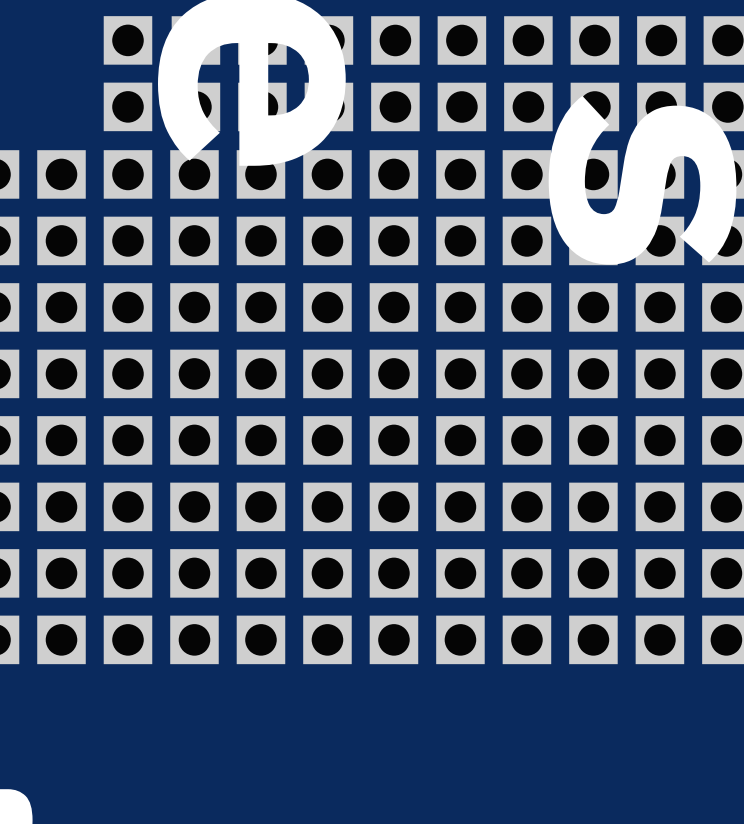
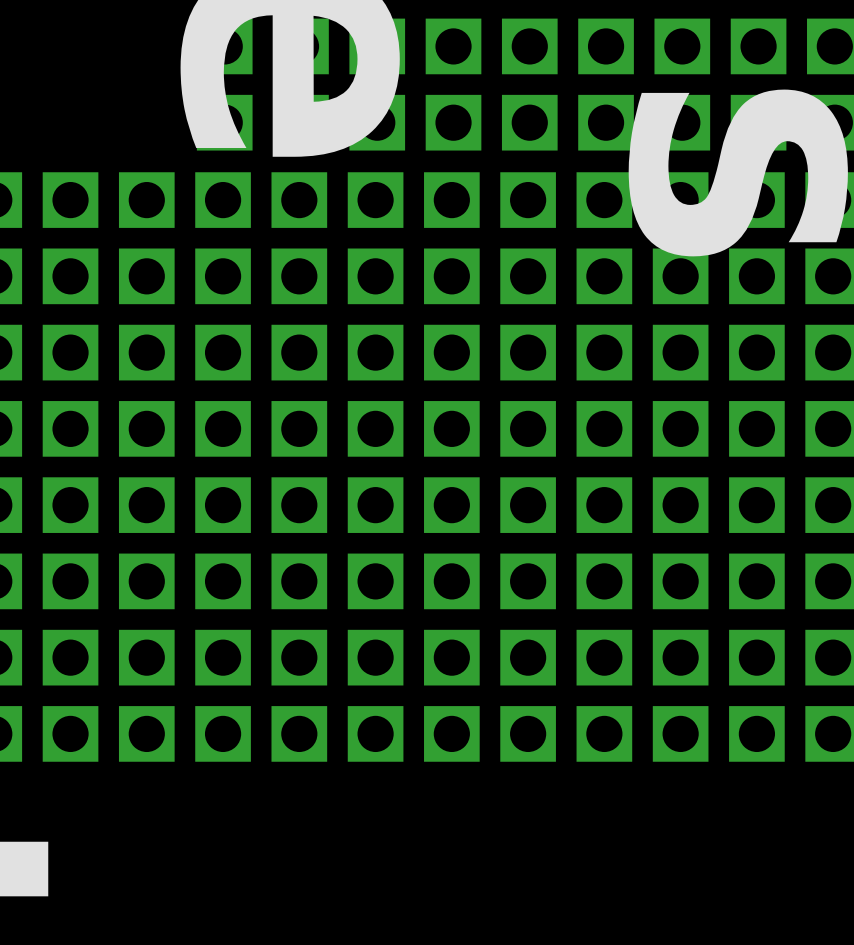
part: (127, 40) -> none
part: (127, 106) -> none

